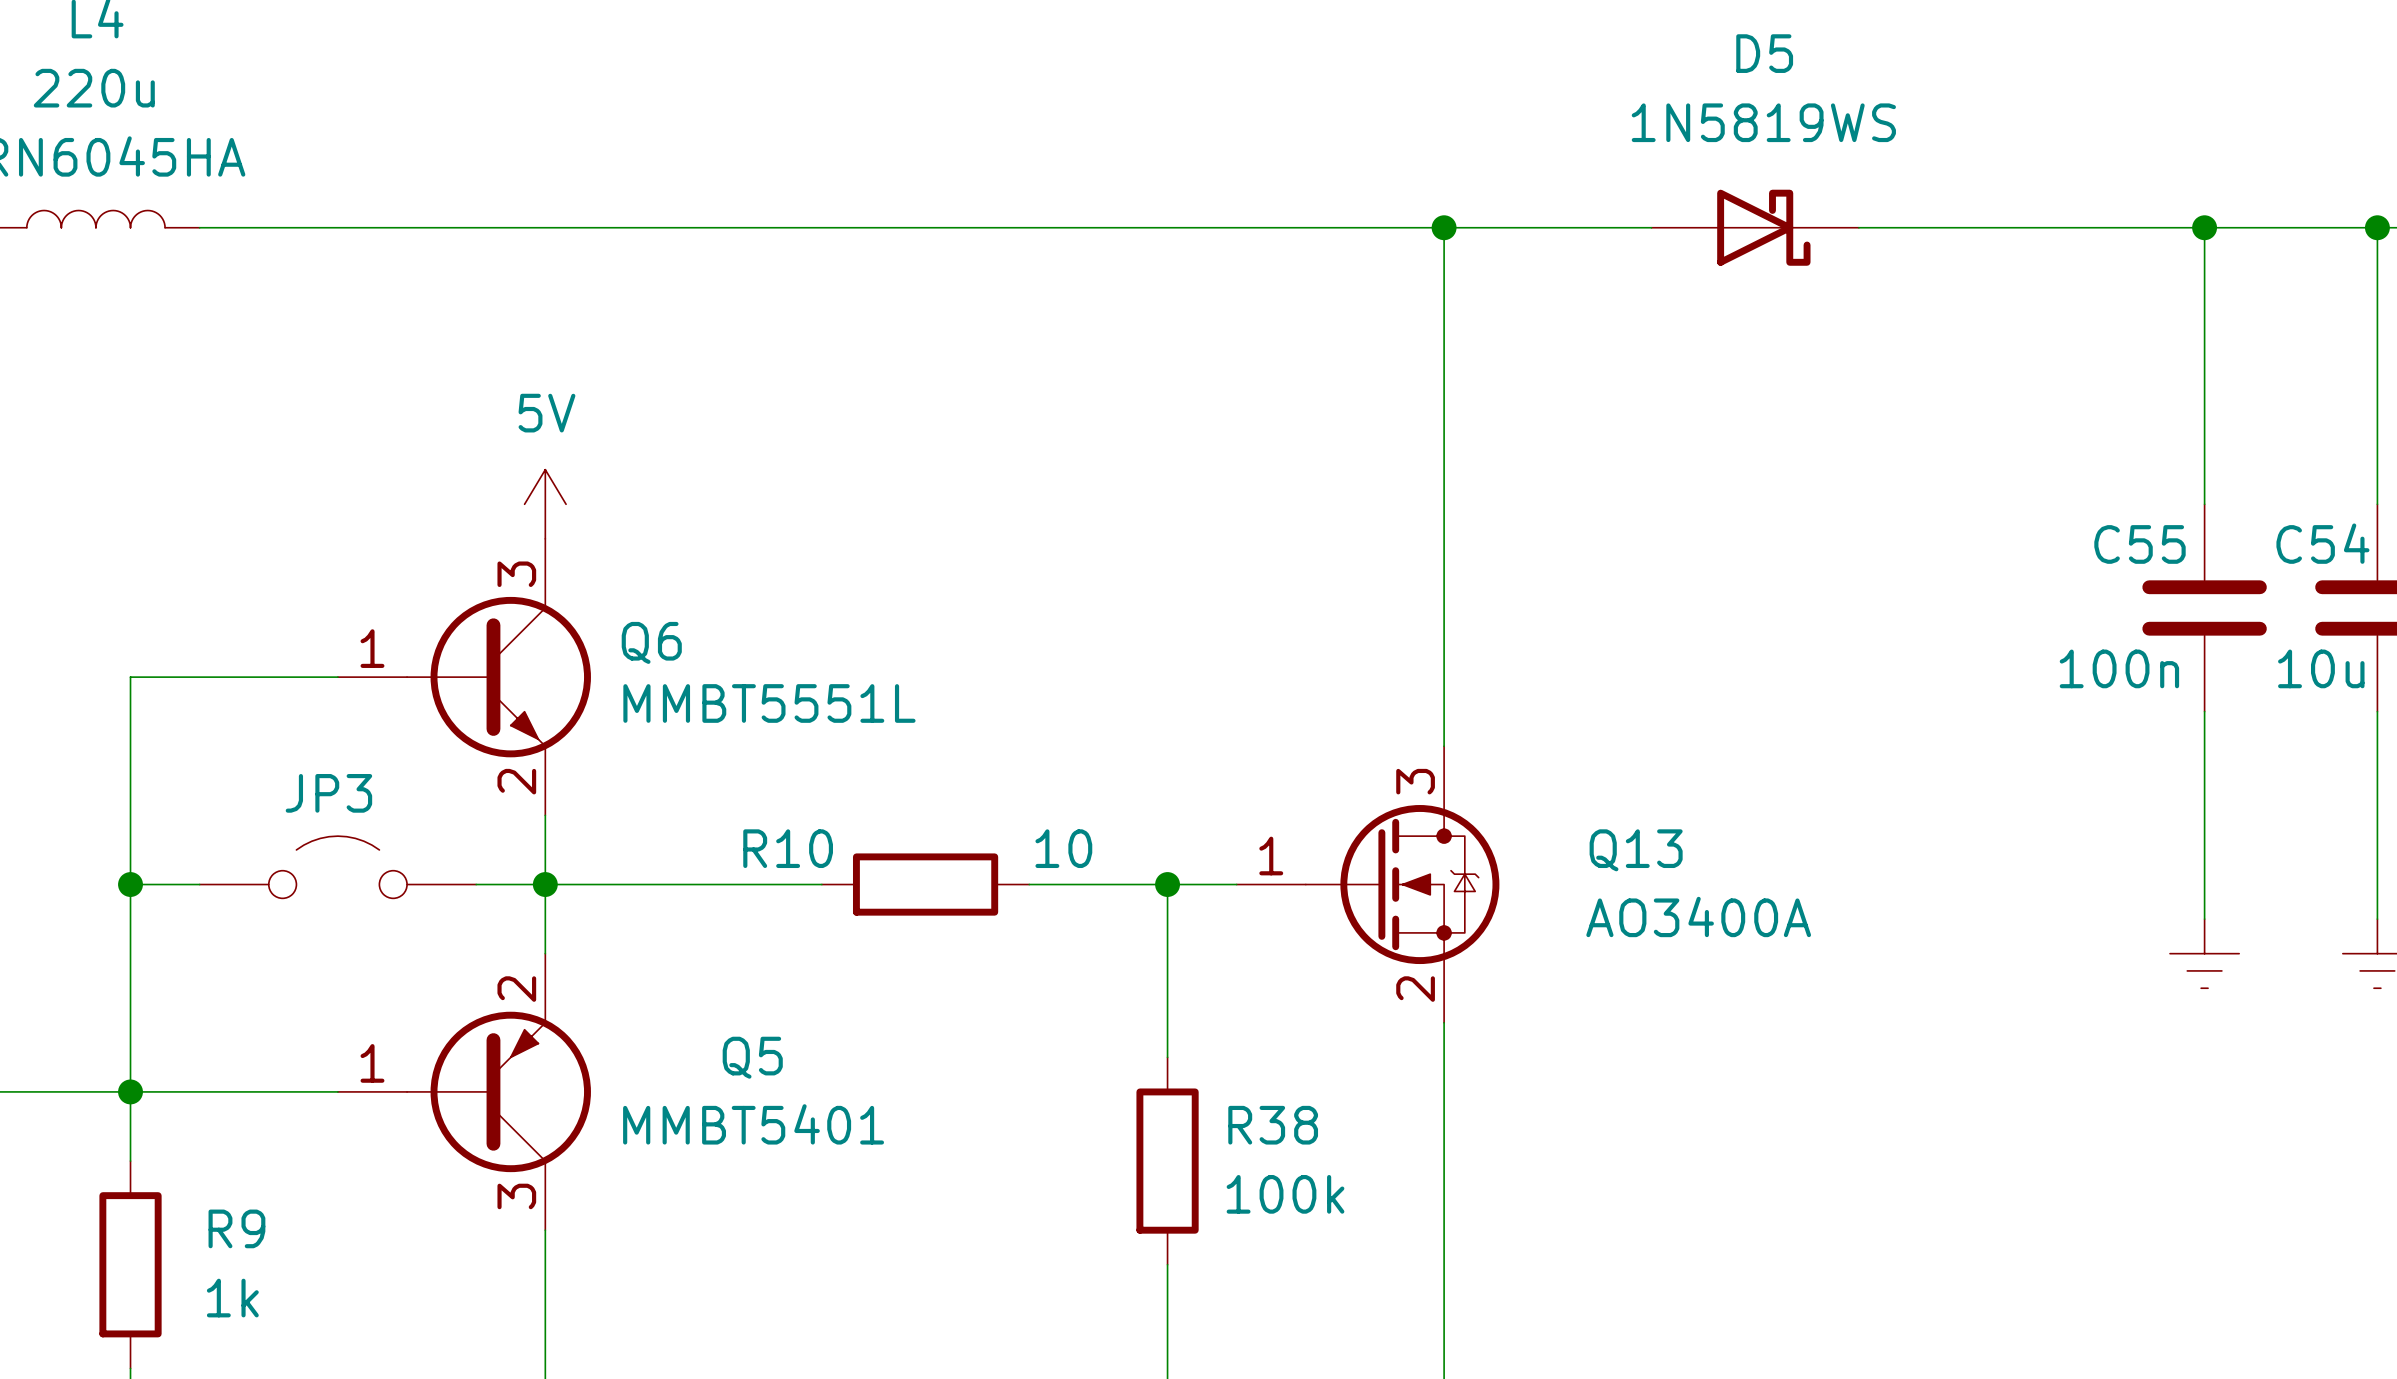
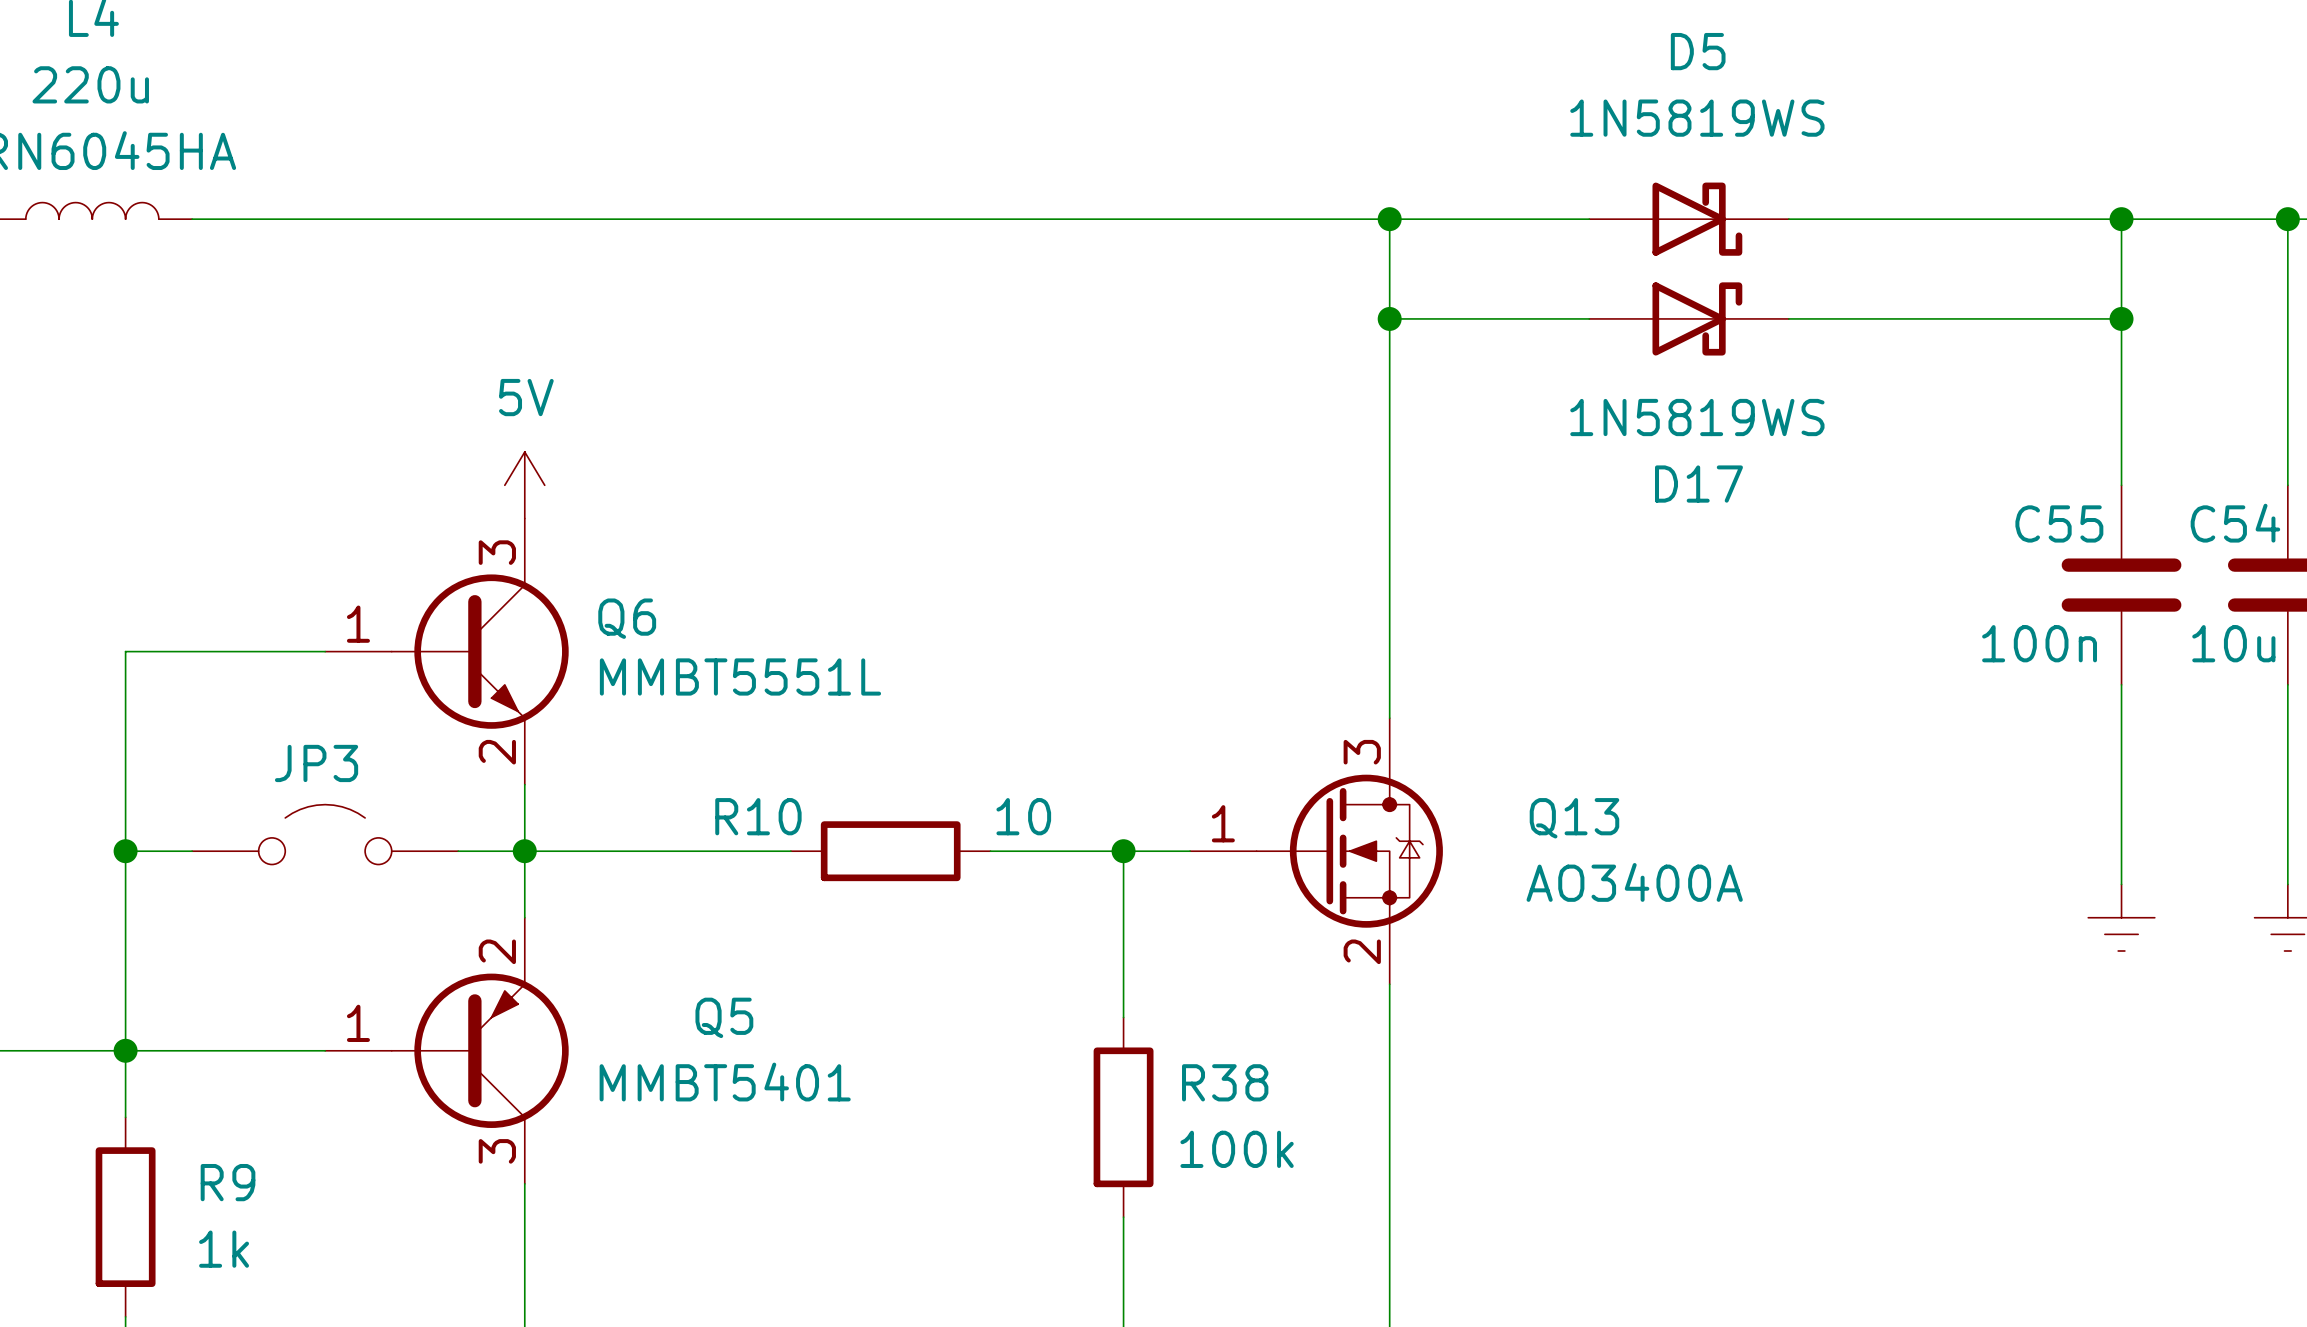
wire: none -> (1389, 318) (1589, 318)
junction: none -> (1389, 318)
D17: none -> 1N5819WS (1689, 318)
wire: none -> (1788, 318) (2121, 318)
junction: none -> (2121, 318)

